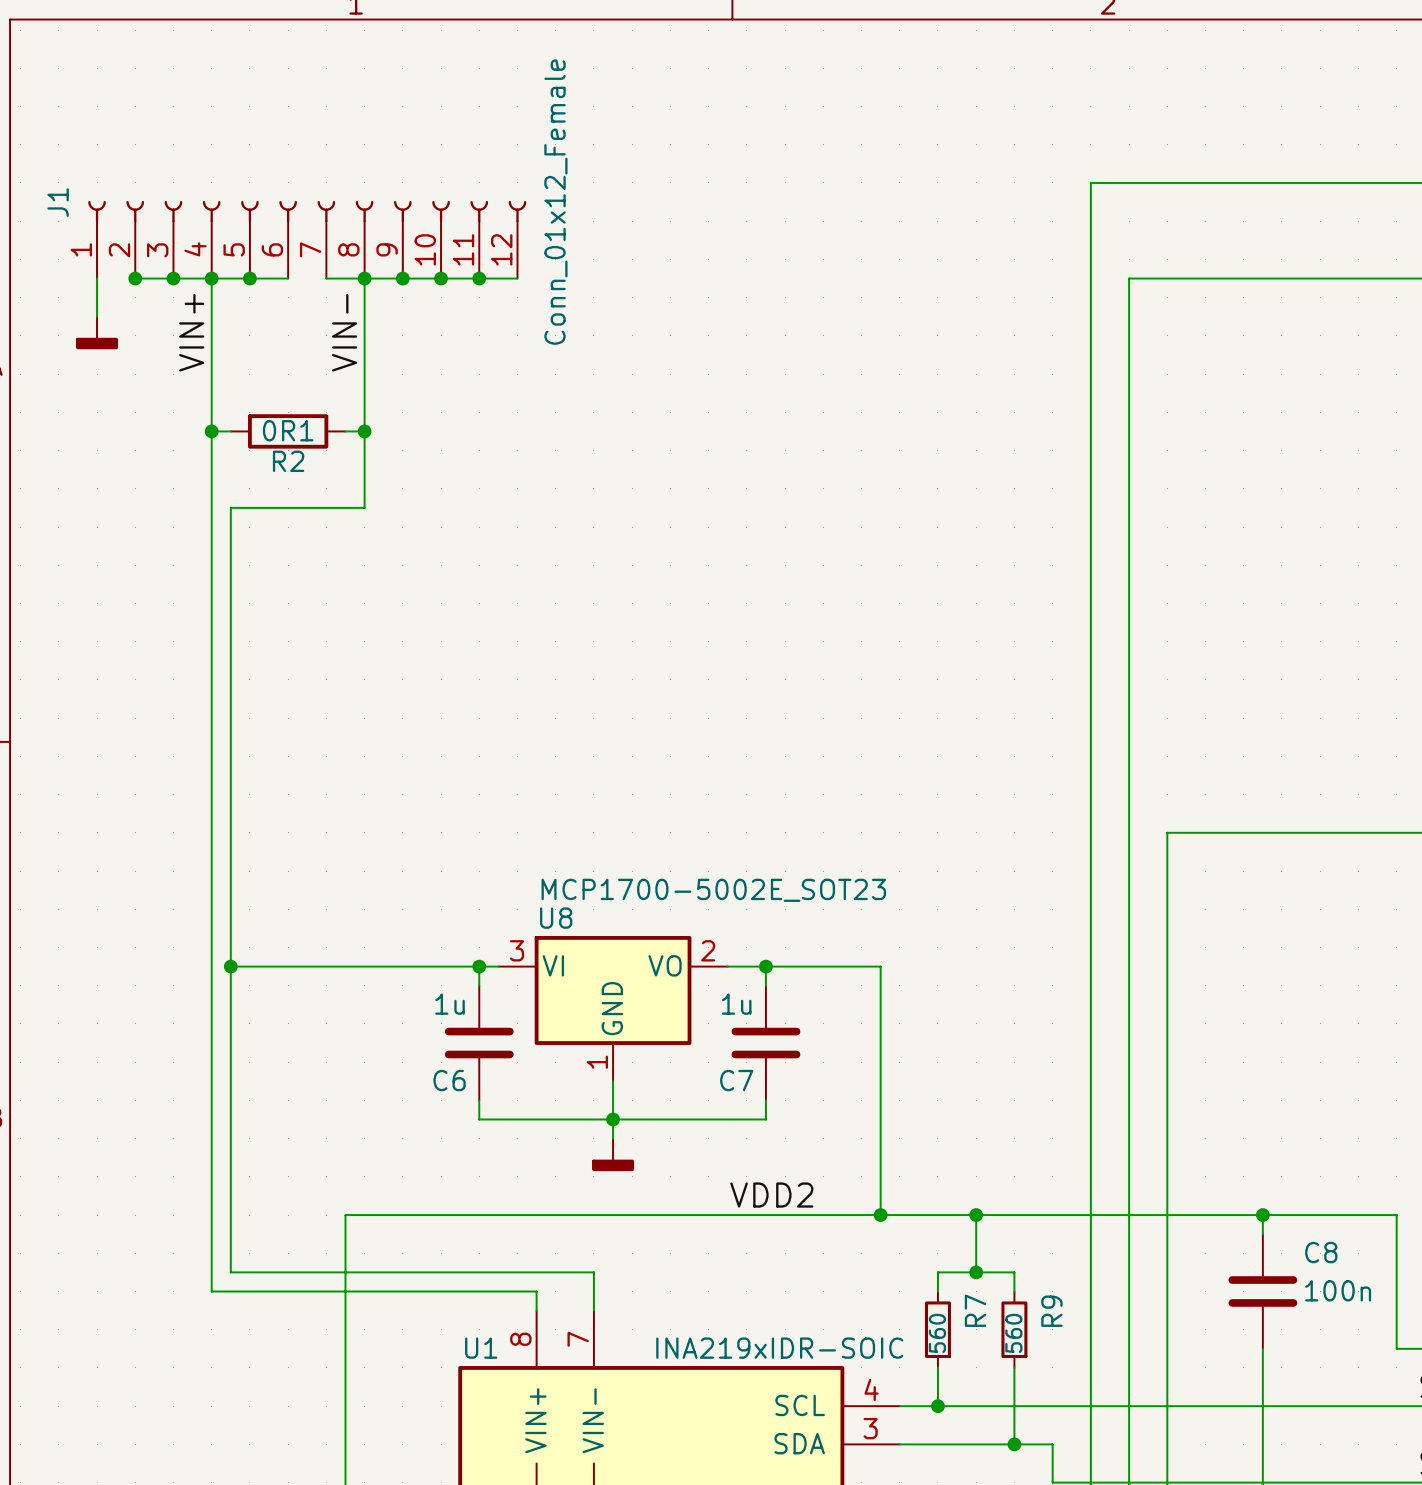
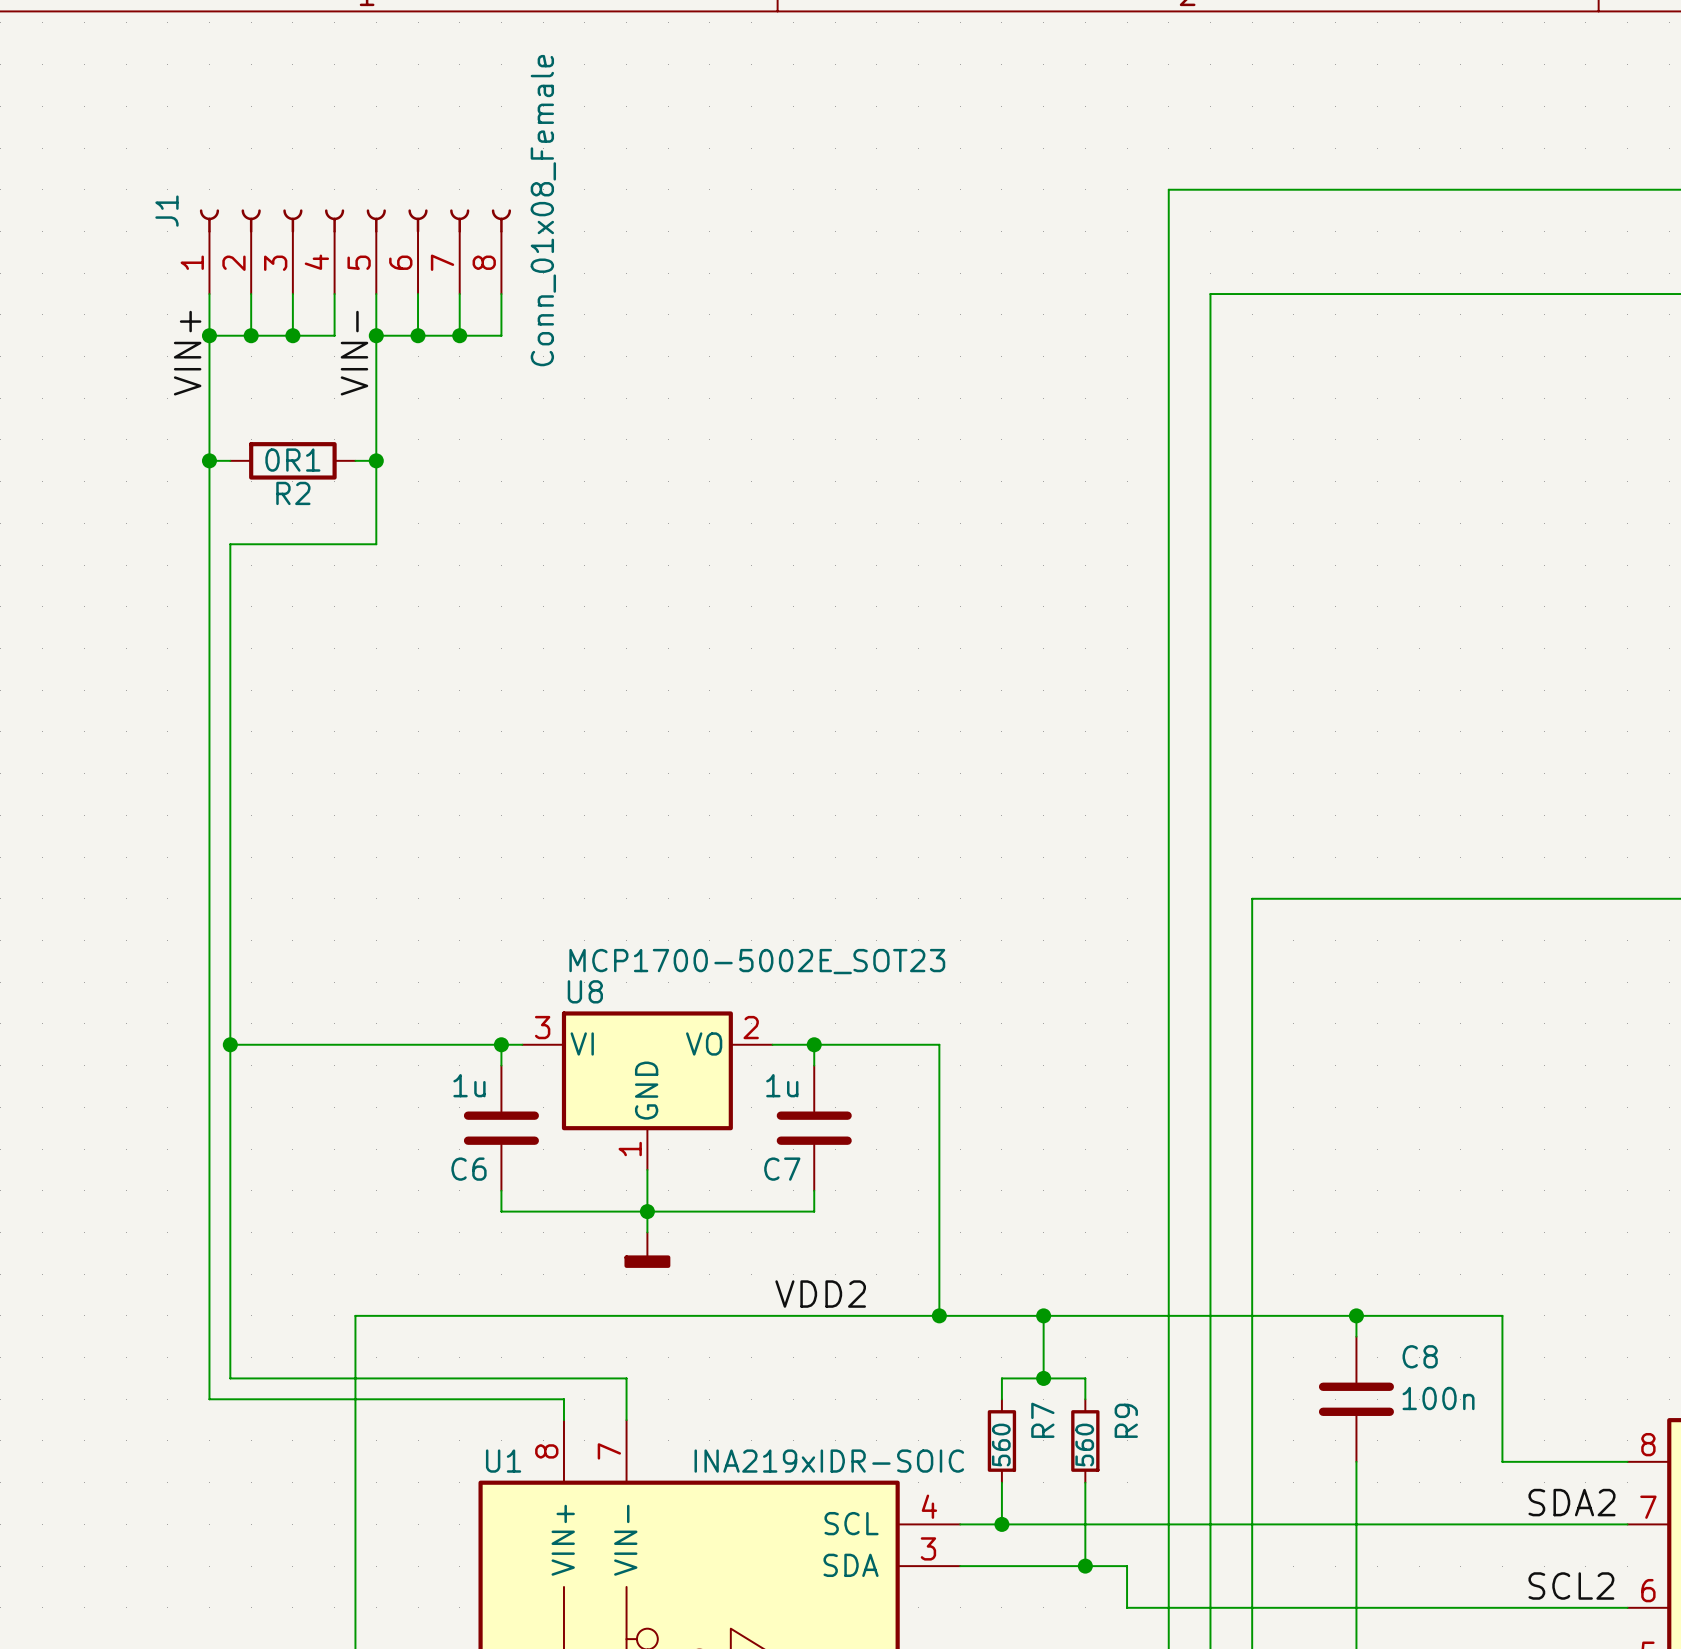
J1 symbol: [88, 200, 527, 279] -> [199, 209, 512, 295]
J1 name position: J1 (58, 202) -> J1 (166, 211)
J1 value: Conn_01x12_Female (555, 202) -> Conn_01x08_Female (543, 210)
wire: (97, 278) (97, 316) -> (251, 294) (251, 335)
wire: (135, 278) (288, 278) -> (292, 335) (292, 294)
junction: (135, 278) -> none
junction: (173, 278) -> none
junction: (211, 278) -> none
junction: (249, 278) -> none
wire: (326, 278) (517, 278) -> (334, 294) (334, 335) (209, 335)
junction: (364, 278) -> none
wire: none -> (418, 294) (418, 335)
junction: (402, 278) -> none
wire: none -> (459, 294) (459, 335)
junction: (441, 278) -> none
wire: none -> (501, 294) (501, 335) (376, 335)
junction: (479, 278) -> none
junction: none -> (209, 335)
junction: none -> (251, 335)
junction: none -> (292, 335)
junction: none -> (376, 335)
junction: none -> (418, 335)
junction: none -> (459, 335)
power symbol: (97, 333) -> none

